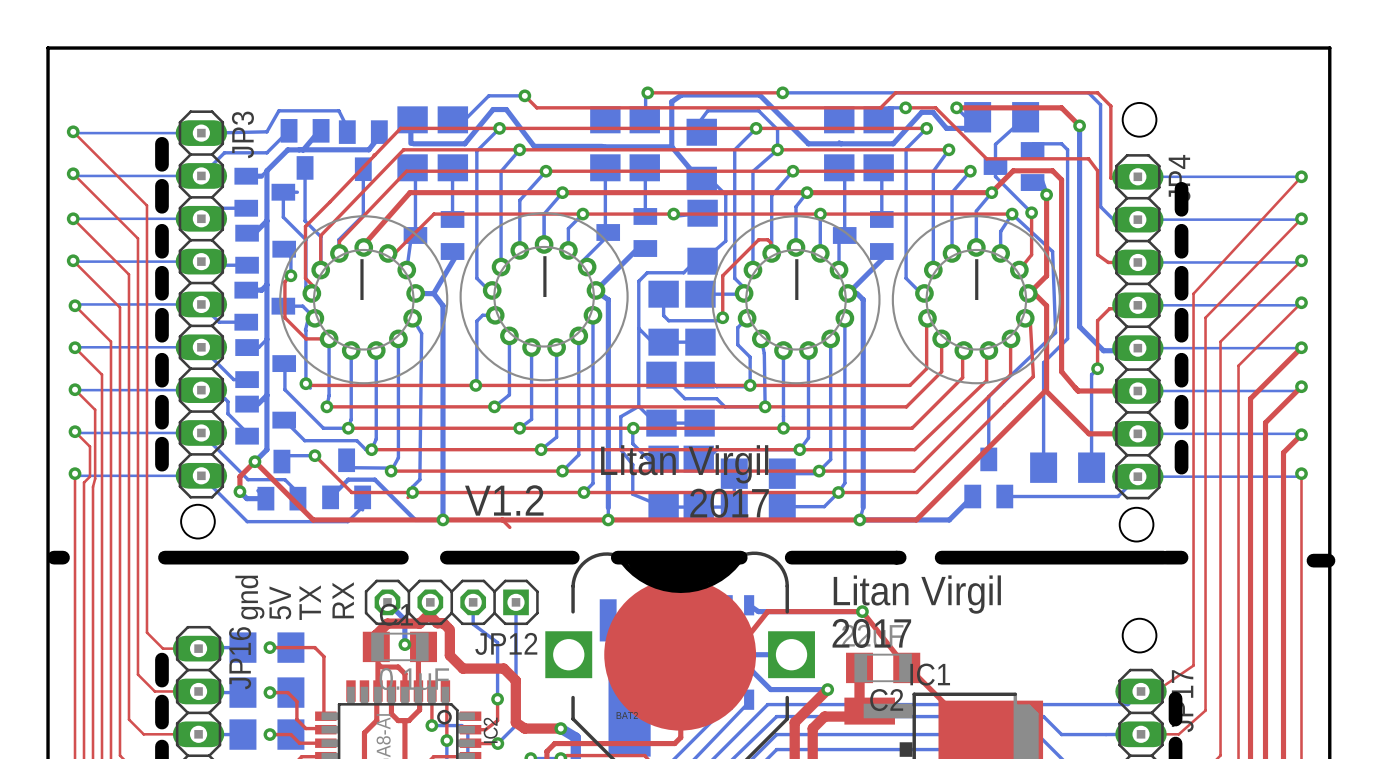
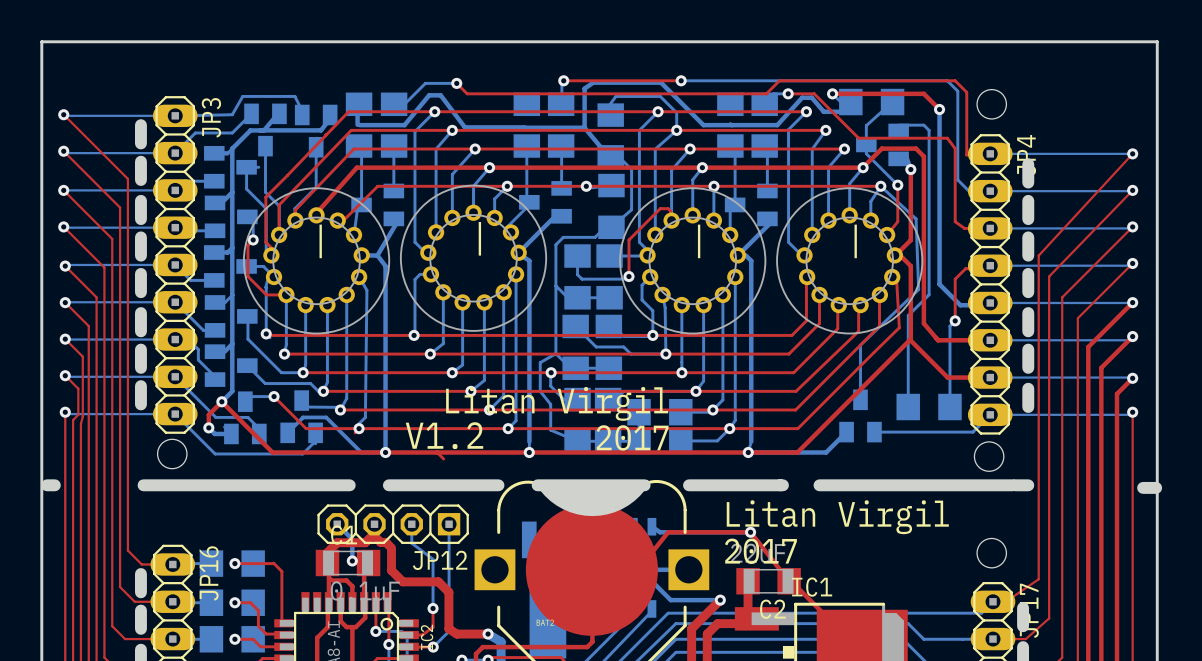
text: gnd (249, 597) -> none
text: RX (343, 600) -> none
text: 5V (280, 602) -> none
text: TX (310, 602) -> none

